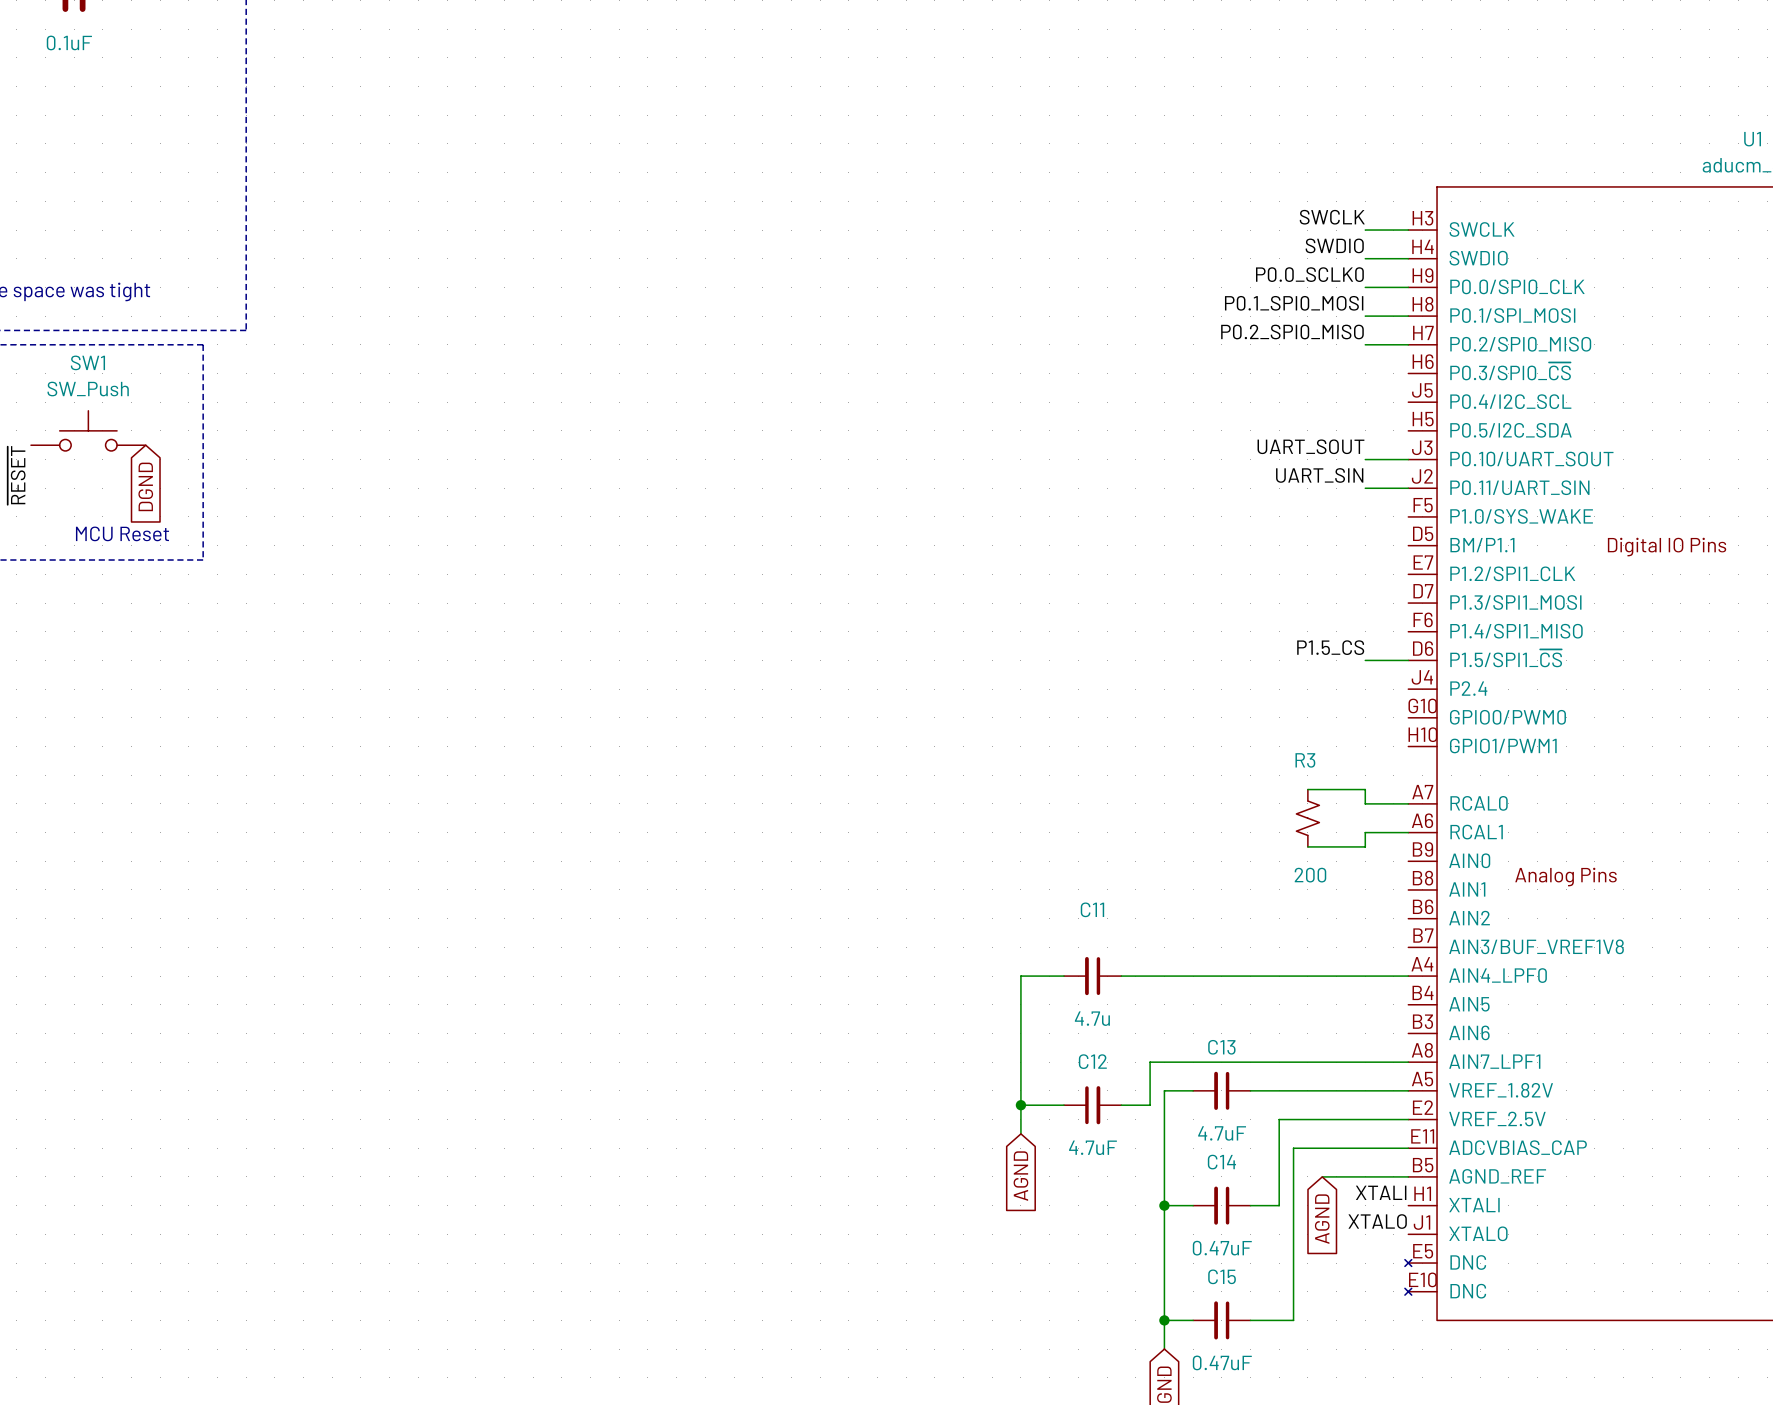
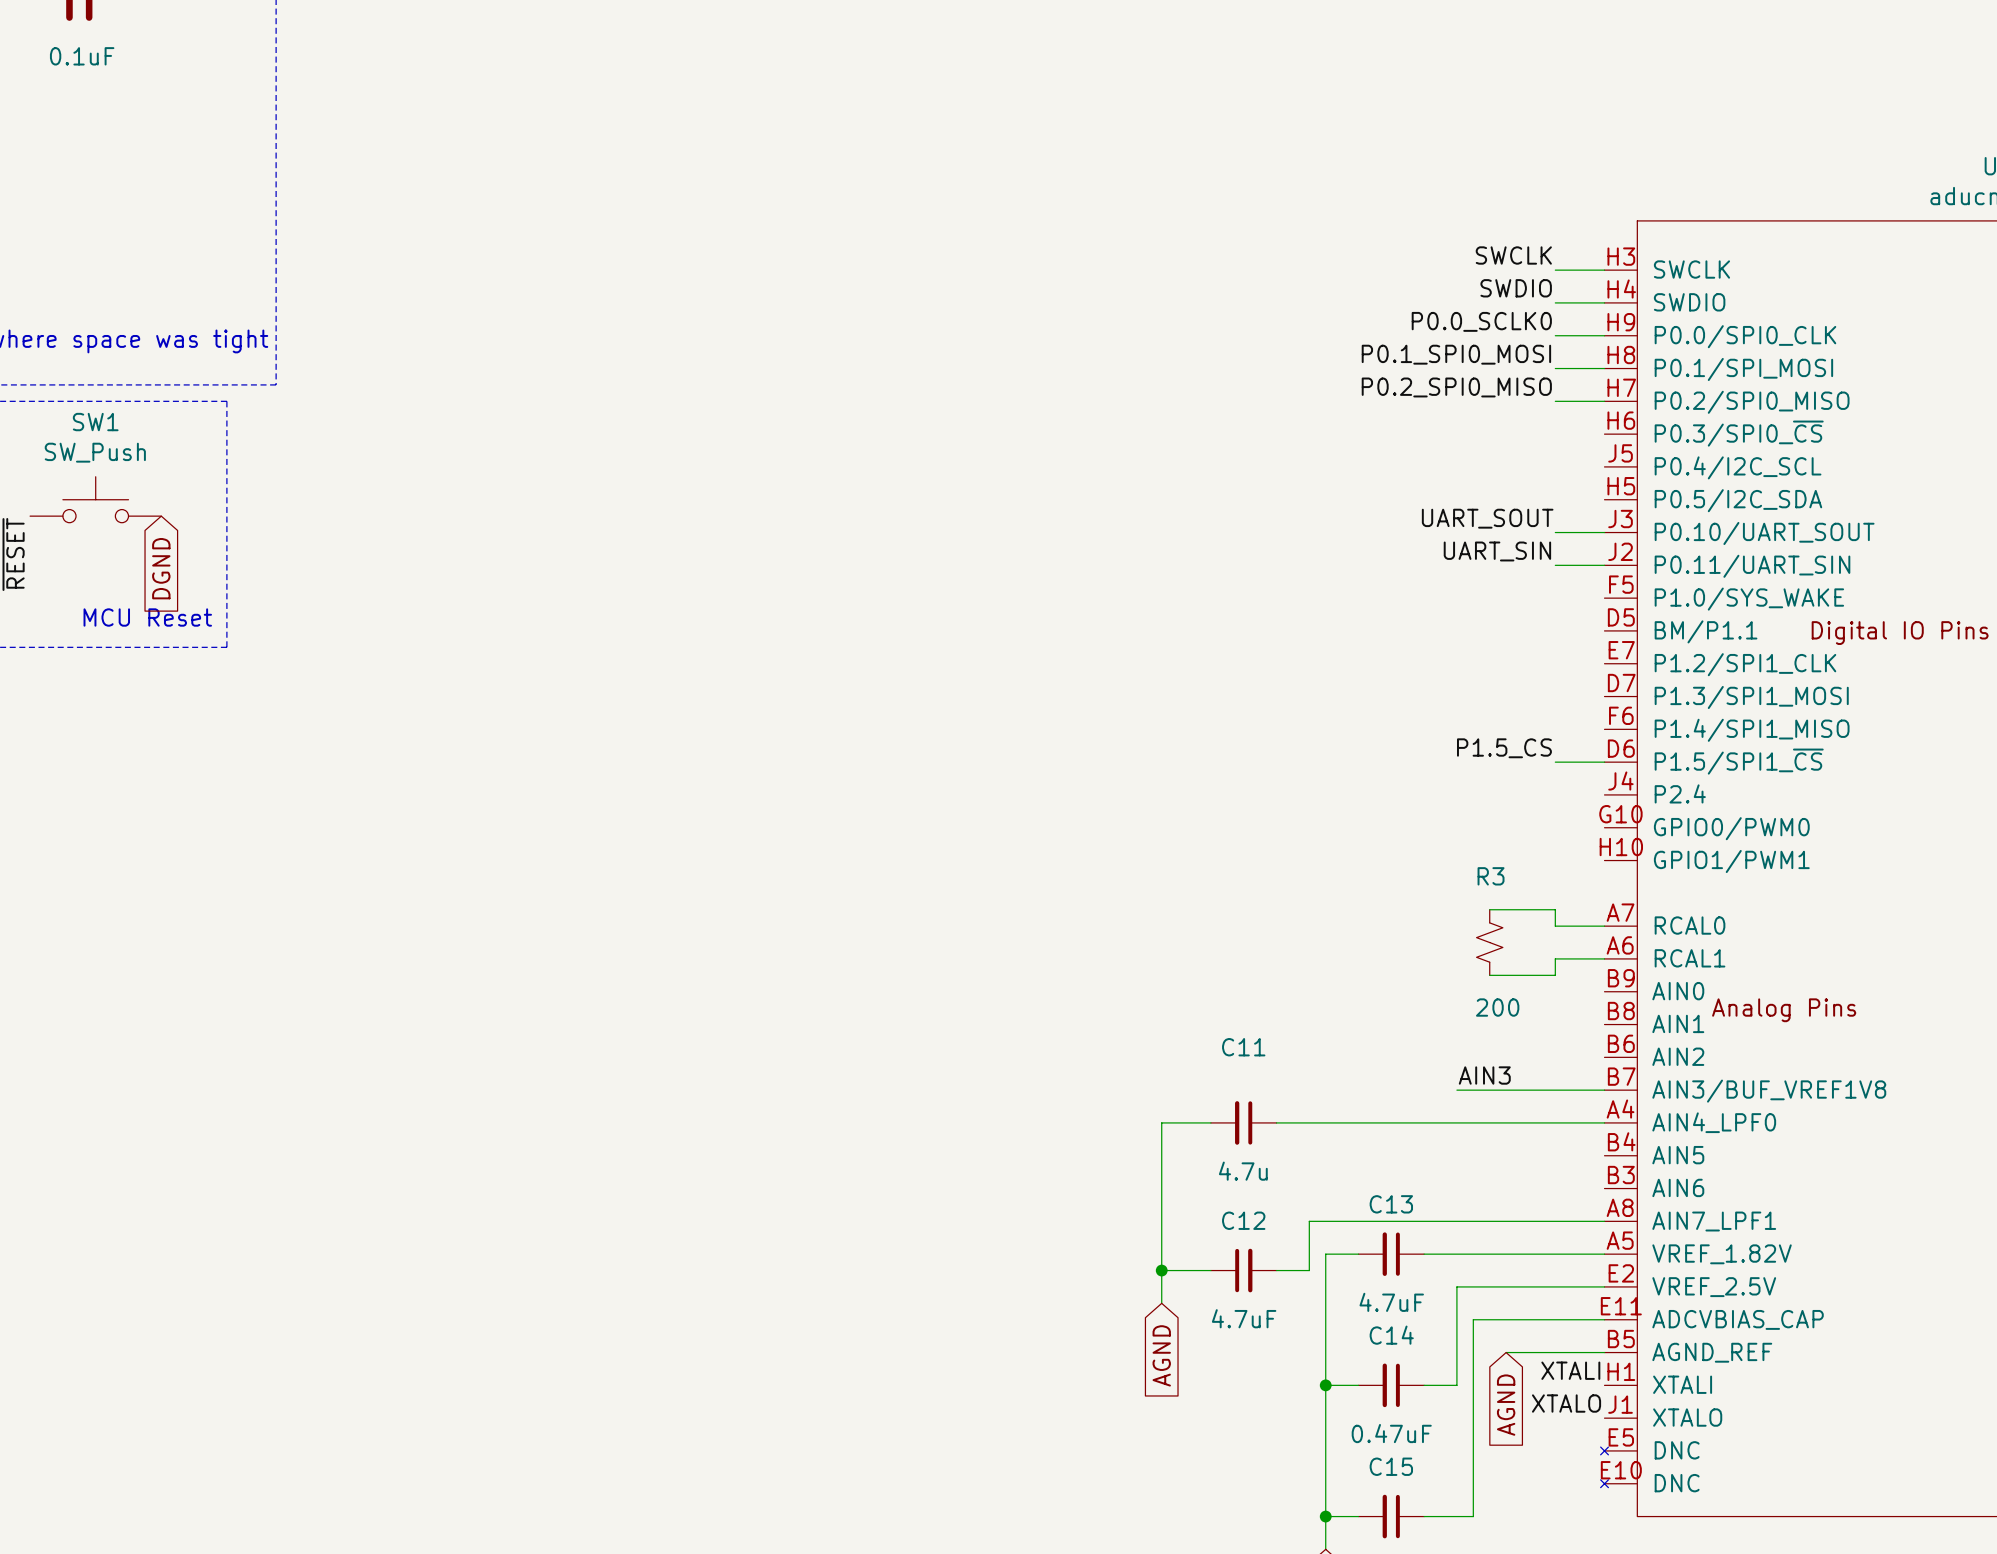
label: none -> AIN3 (1484, 1075)
wire: none -> (1456, 1090) (1604, 1090)

